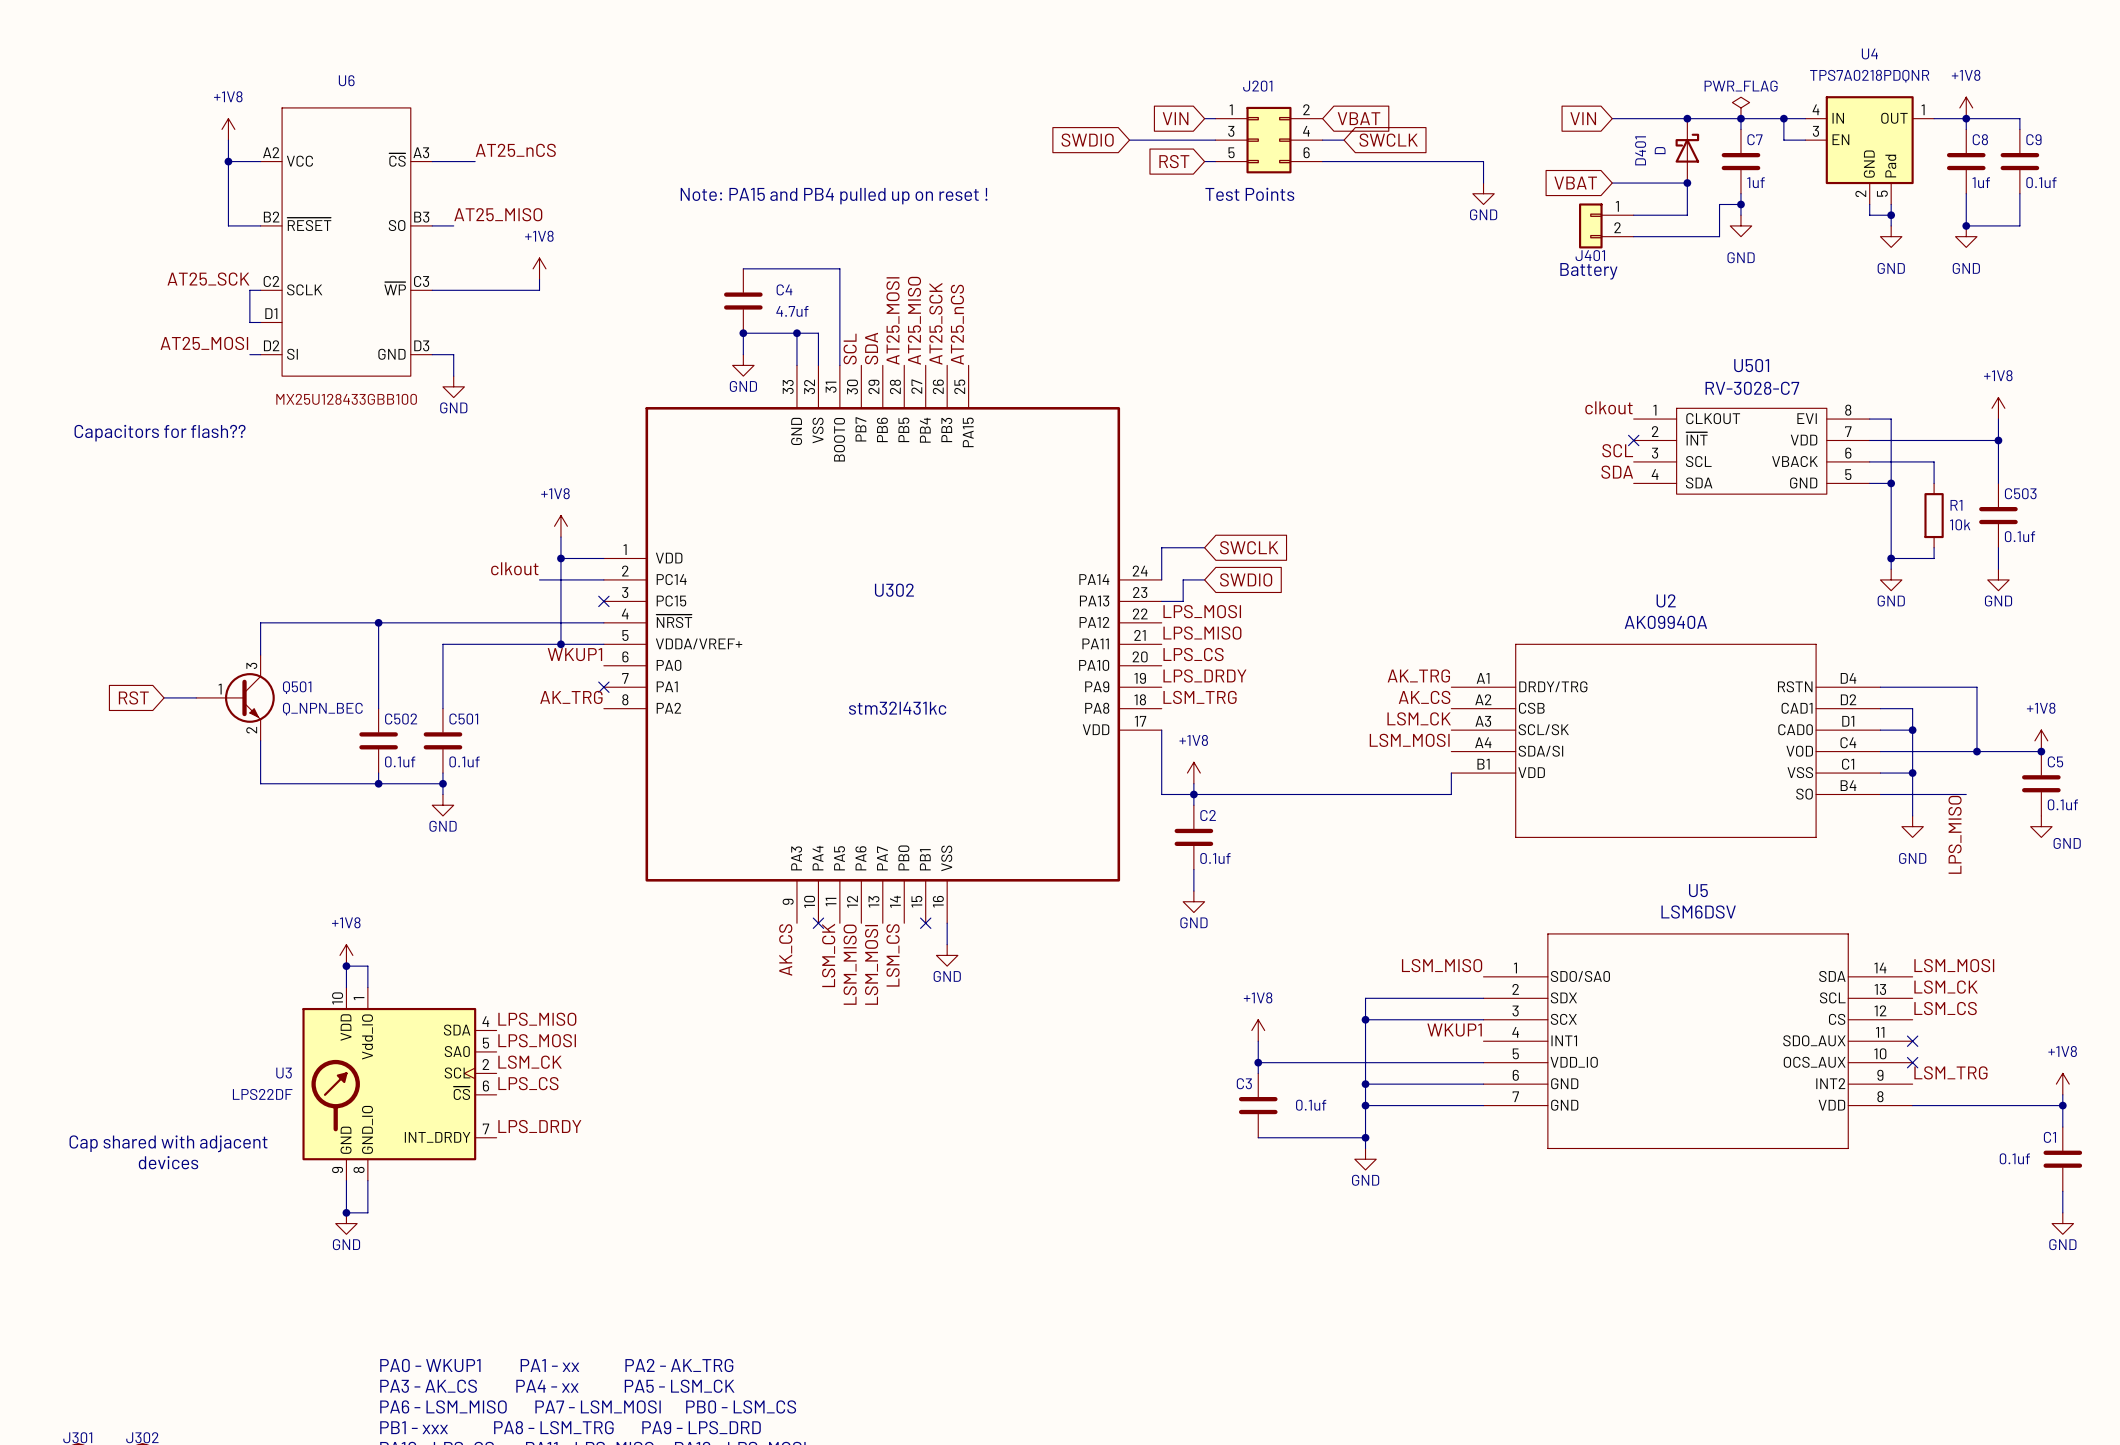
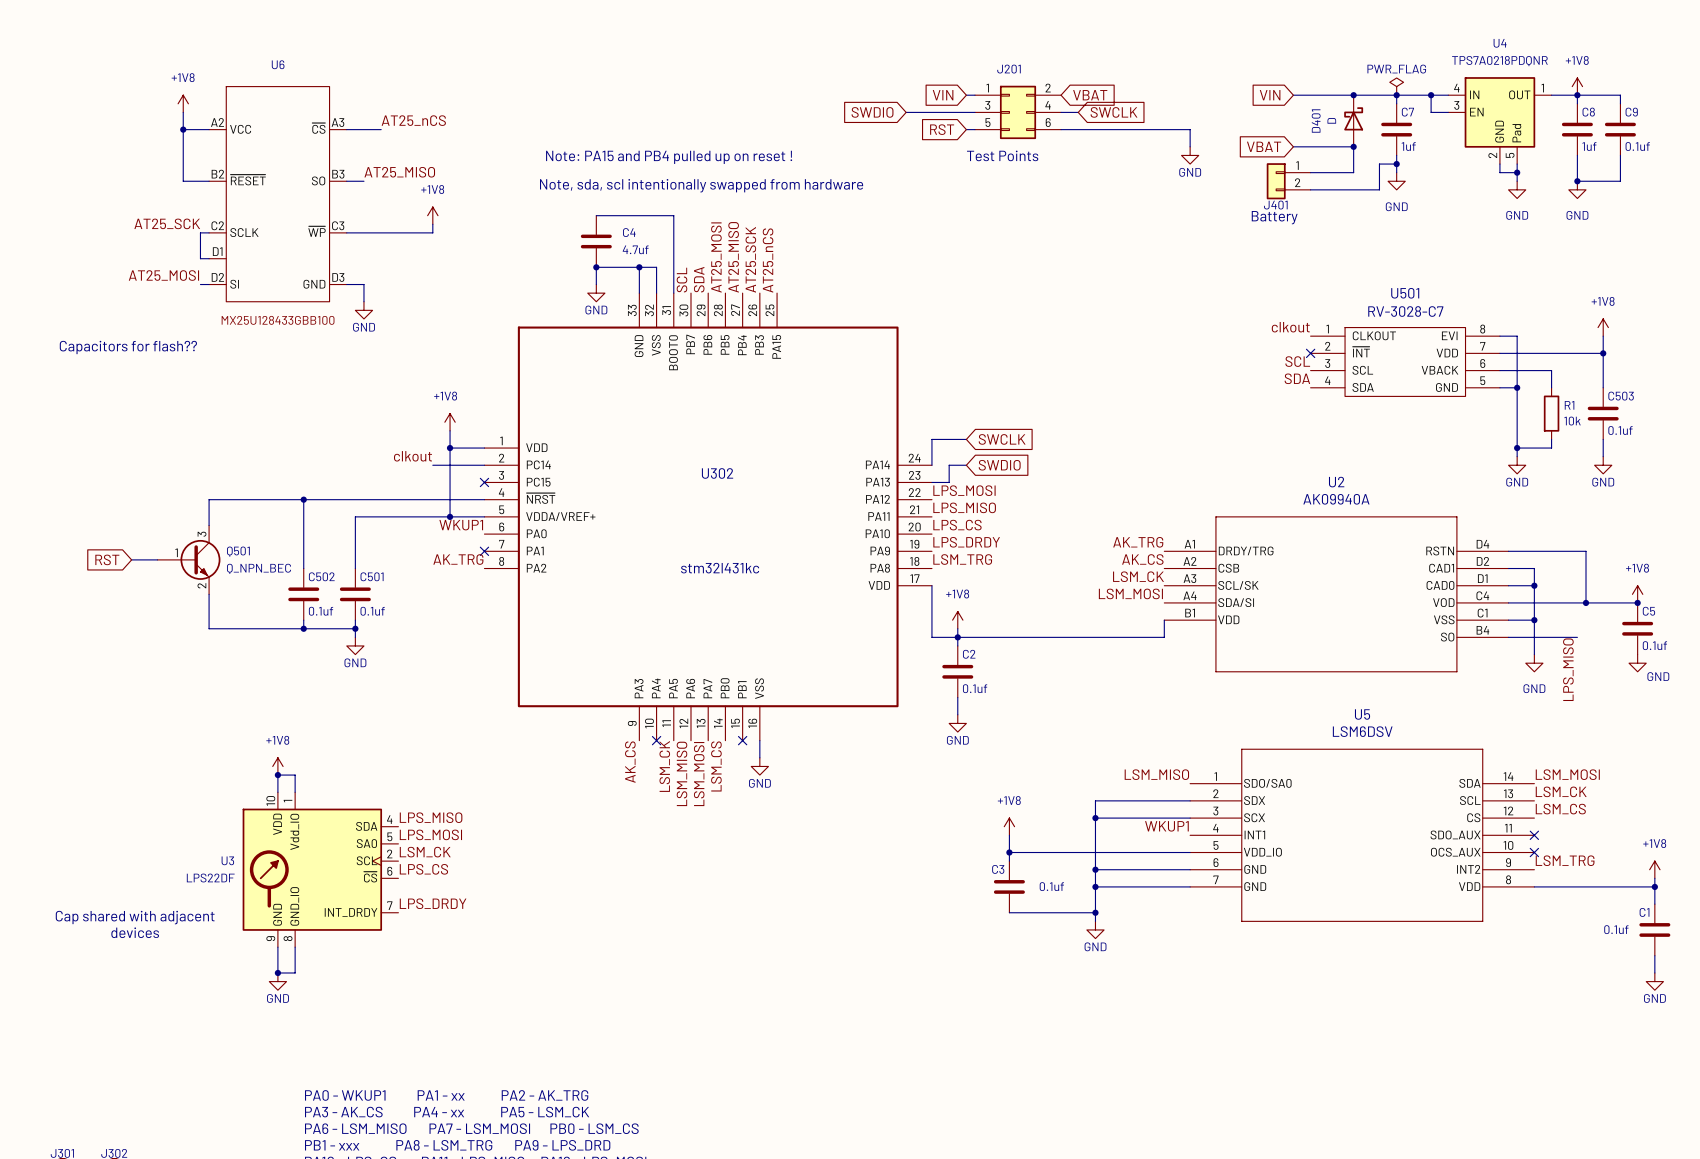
text: none -> Note, sda, scl intentionally swapped from hardware (701, 185)

